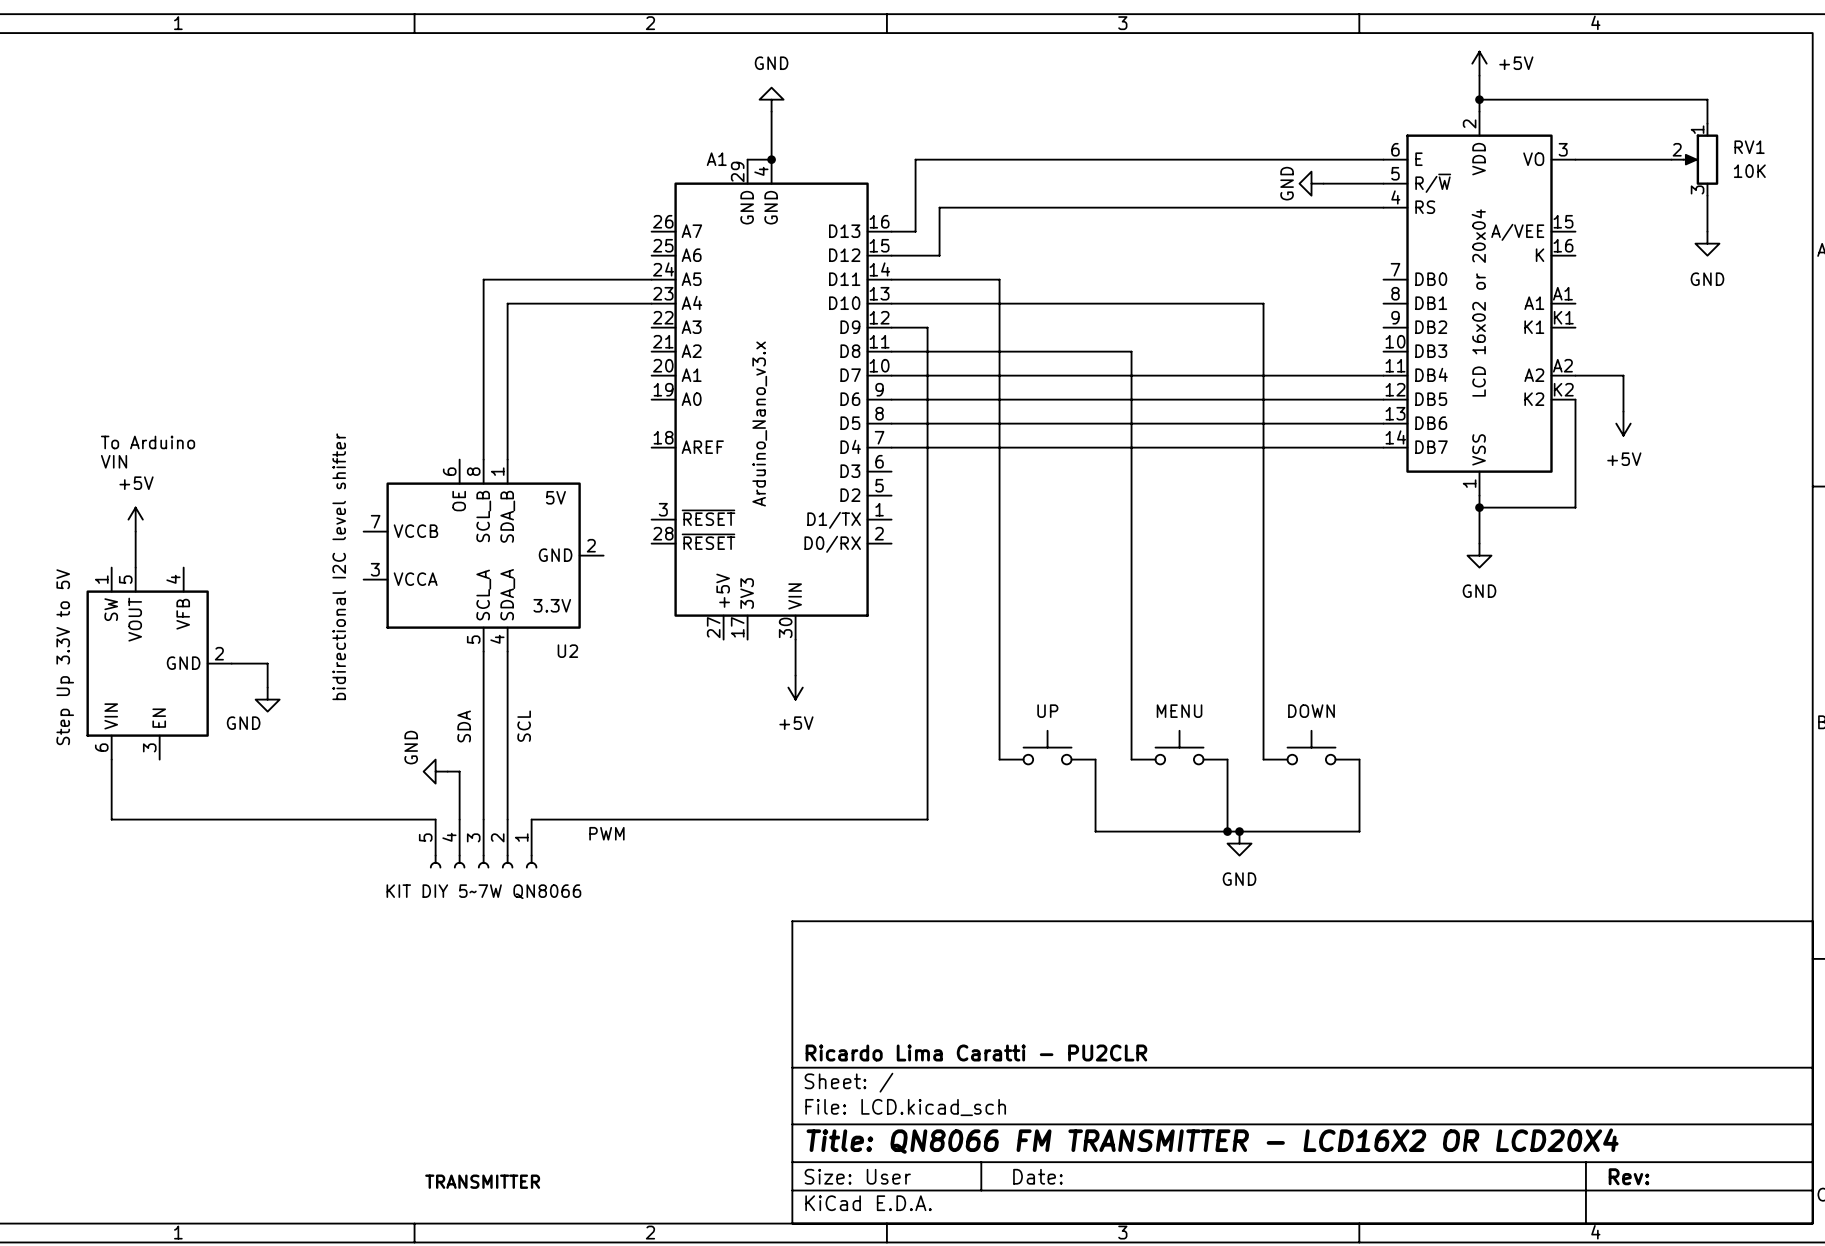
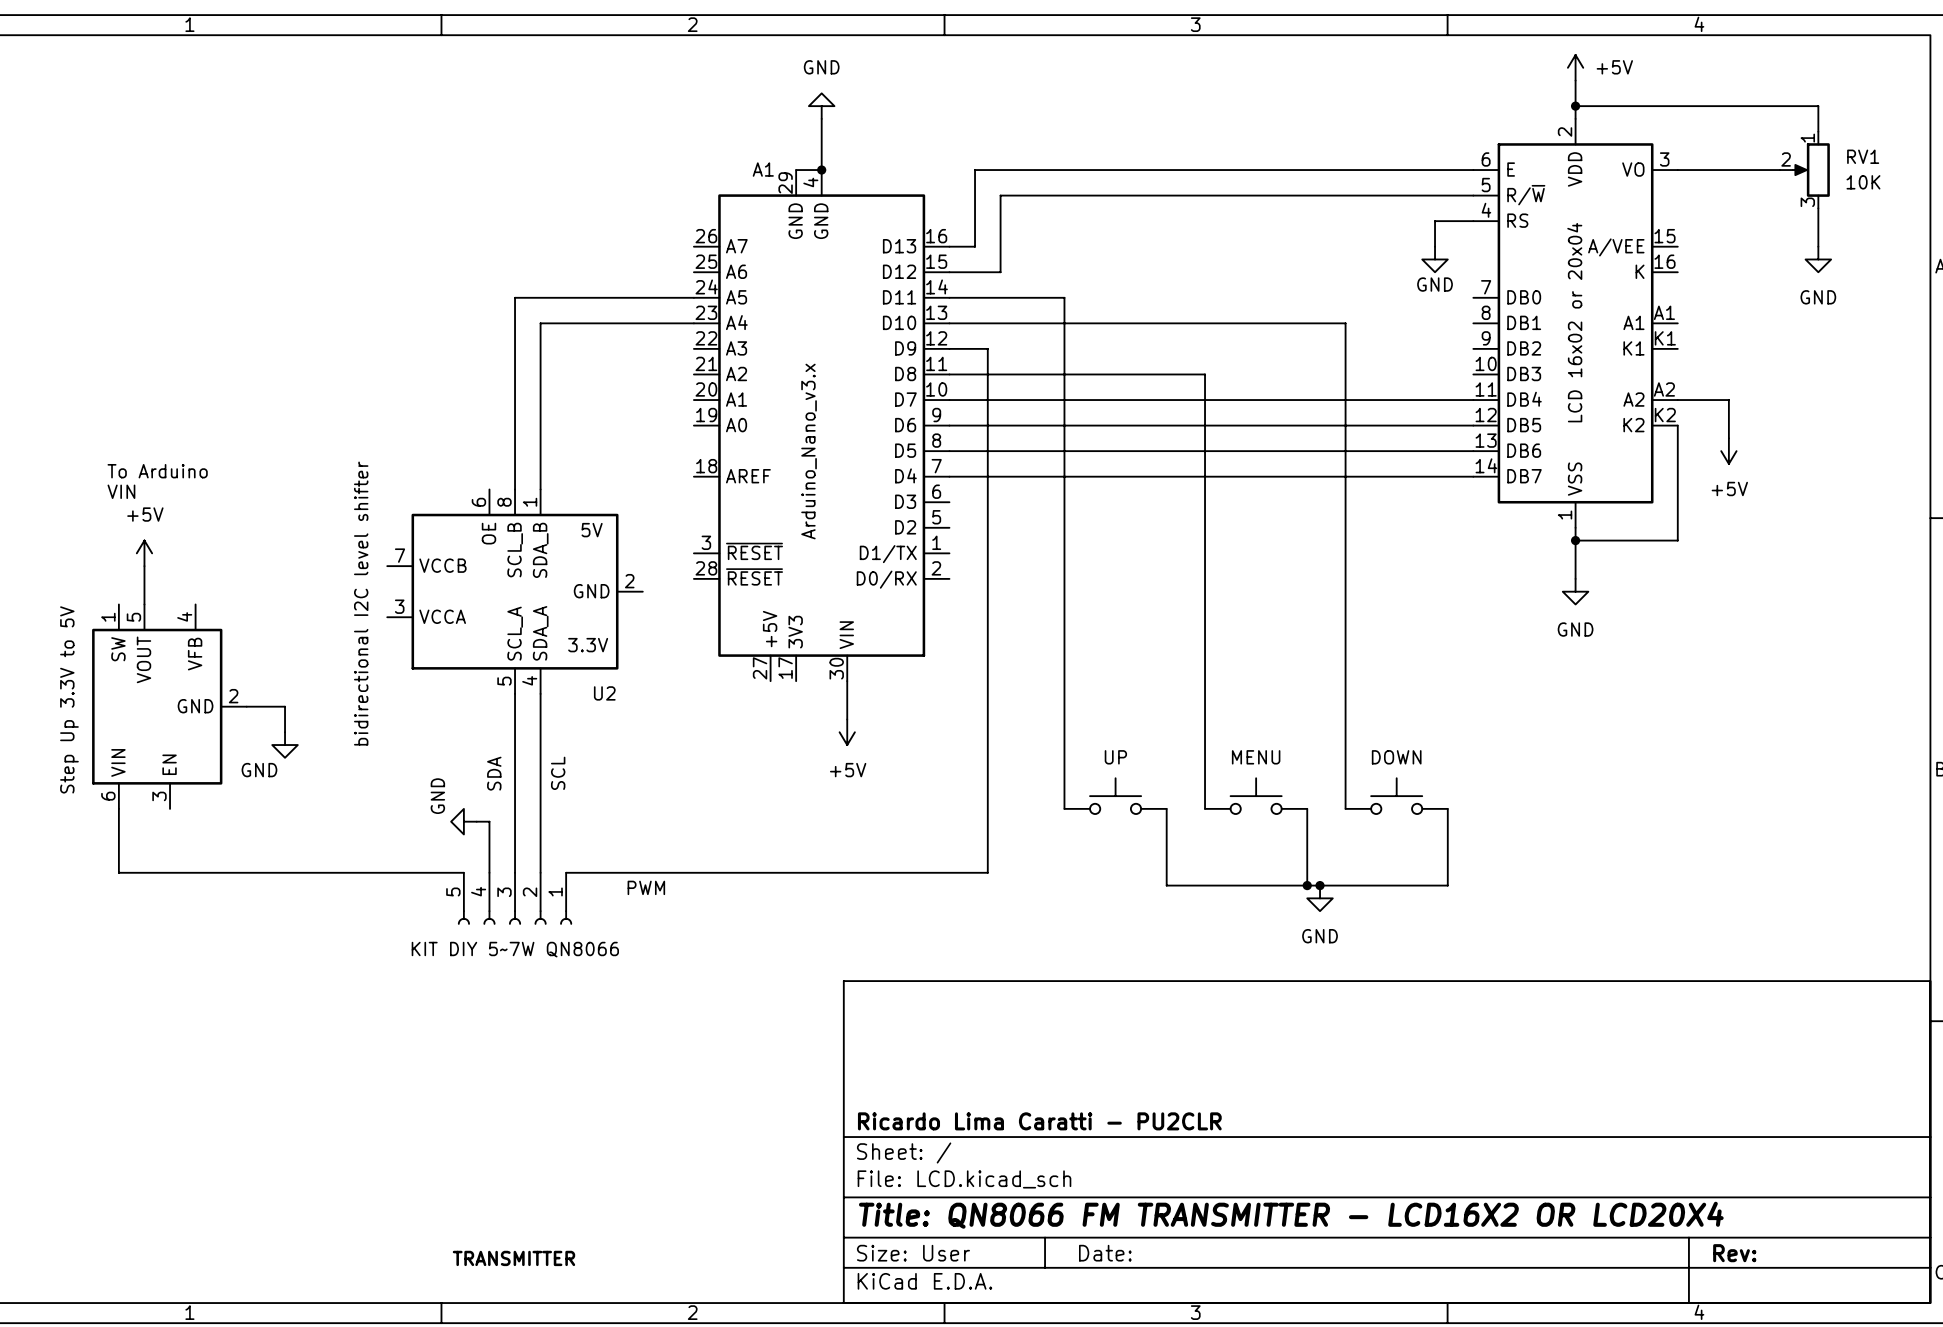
power symbol rotation: 0° (1311, 183) -> 90° counterclockwise (1435, 259)
power symbol position: GND (1311, 183) -> GND (1435, 259)
wire: (939, 207) (1347, 207) -> (1000, 221) (1000, 195) (1409, 195)
wire: none -> (1435, 221) (1435, 246)

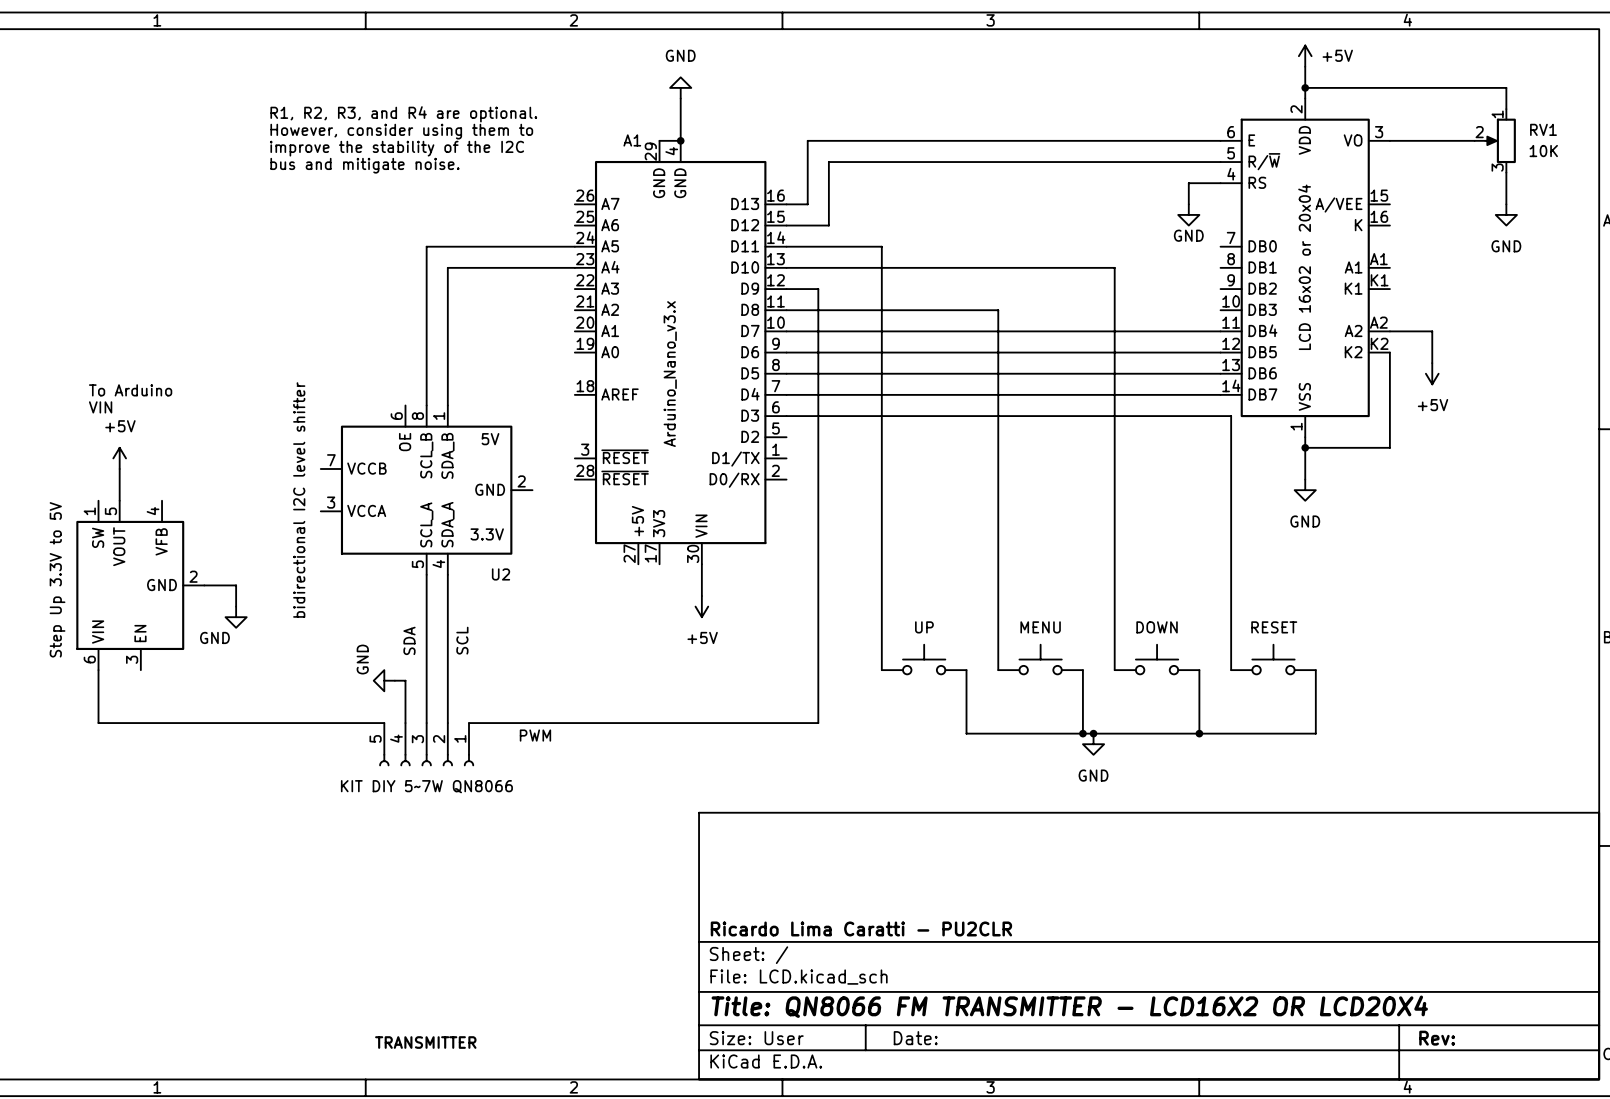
text: none -> R1, R2, R3, and R4 are optional. (403, 114)
text: none -> However, consider using them to (401, 131)
text: none -> improve the stability of the I2C (396, 148)
text: none -> bus and mitigate noise. (364, 165)
wire: none -> (786, 416) (1231, 416) (1231, 670)
RESET: none -> (1273, 659)
wire: none -> (1315, 670) (1315, 733) (1199, 733)
junction: none -> (1199, 733)

